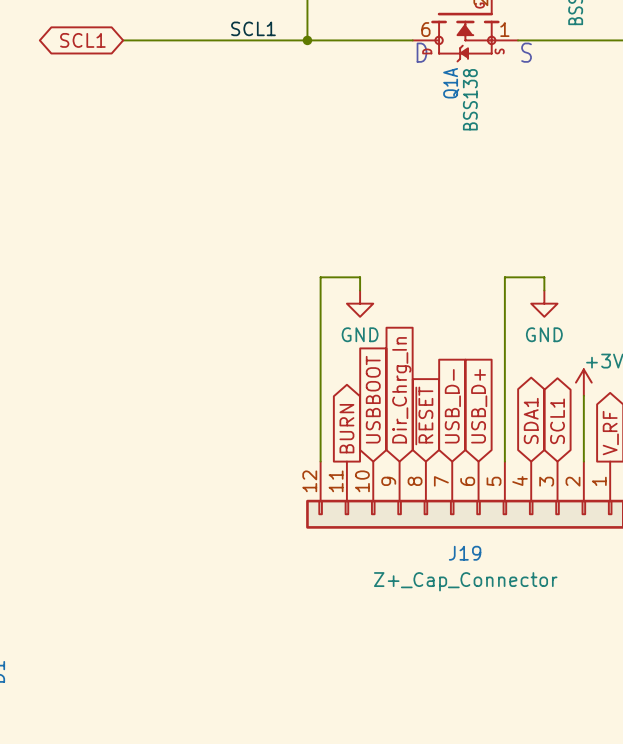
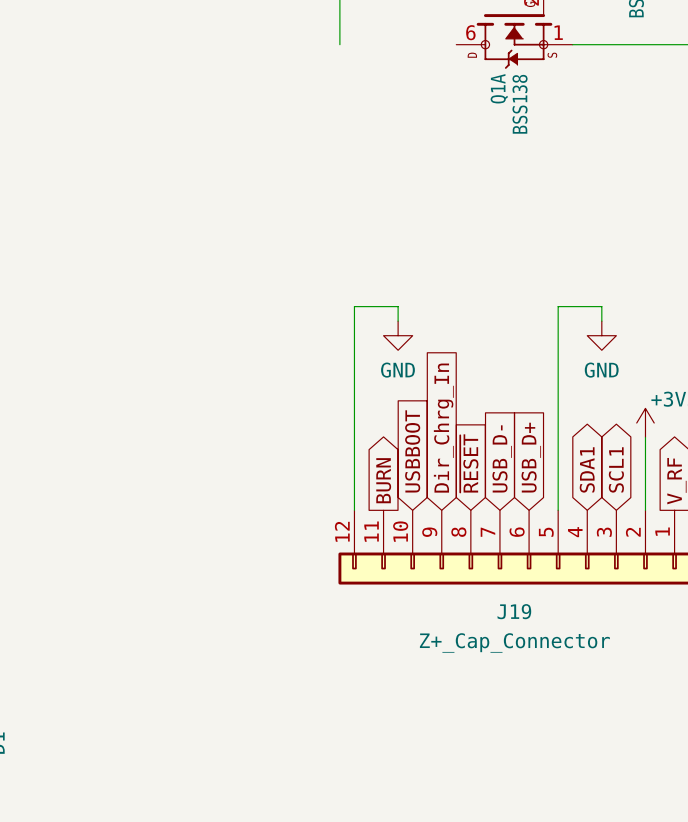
label: SCL1 (253, 28) -> none
global label: SCL1 (82, 40) -> none
wire: (123, 40) (412, 40) -> none
junction: (307, 40) -> none
text: D (421, 52) -> none
text: S (526, 52) -> none

